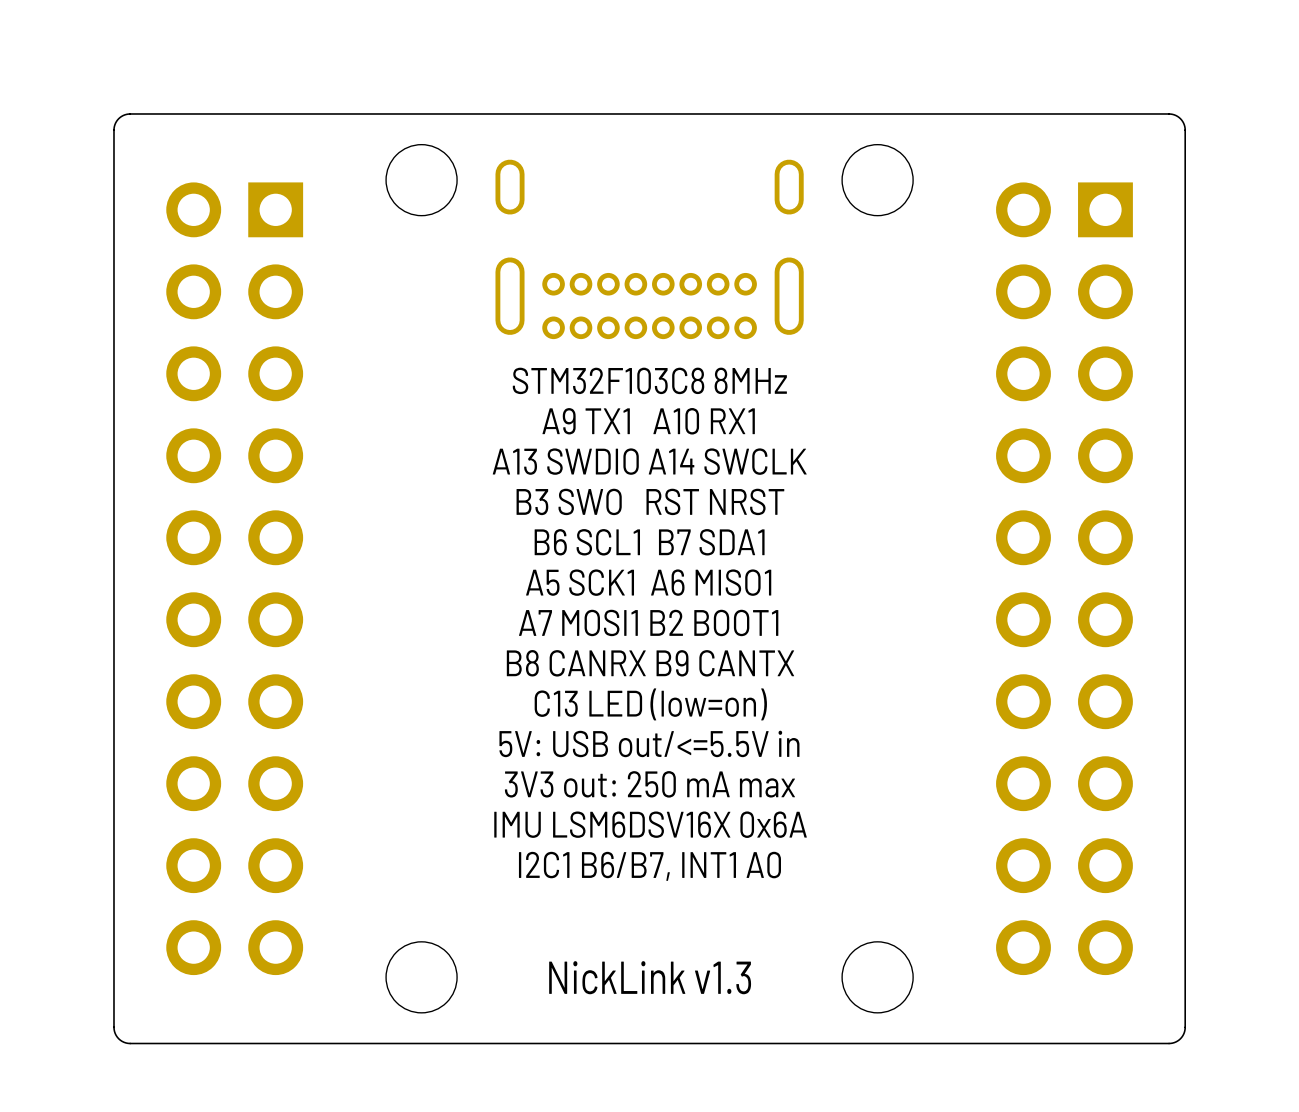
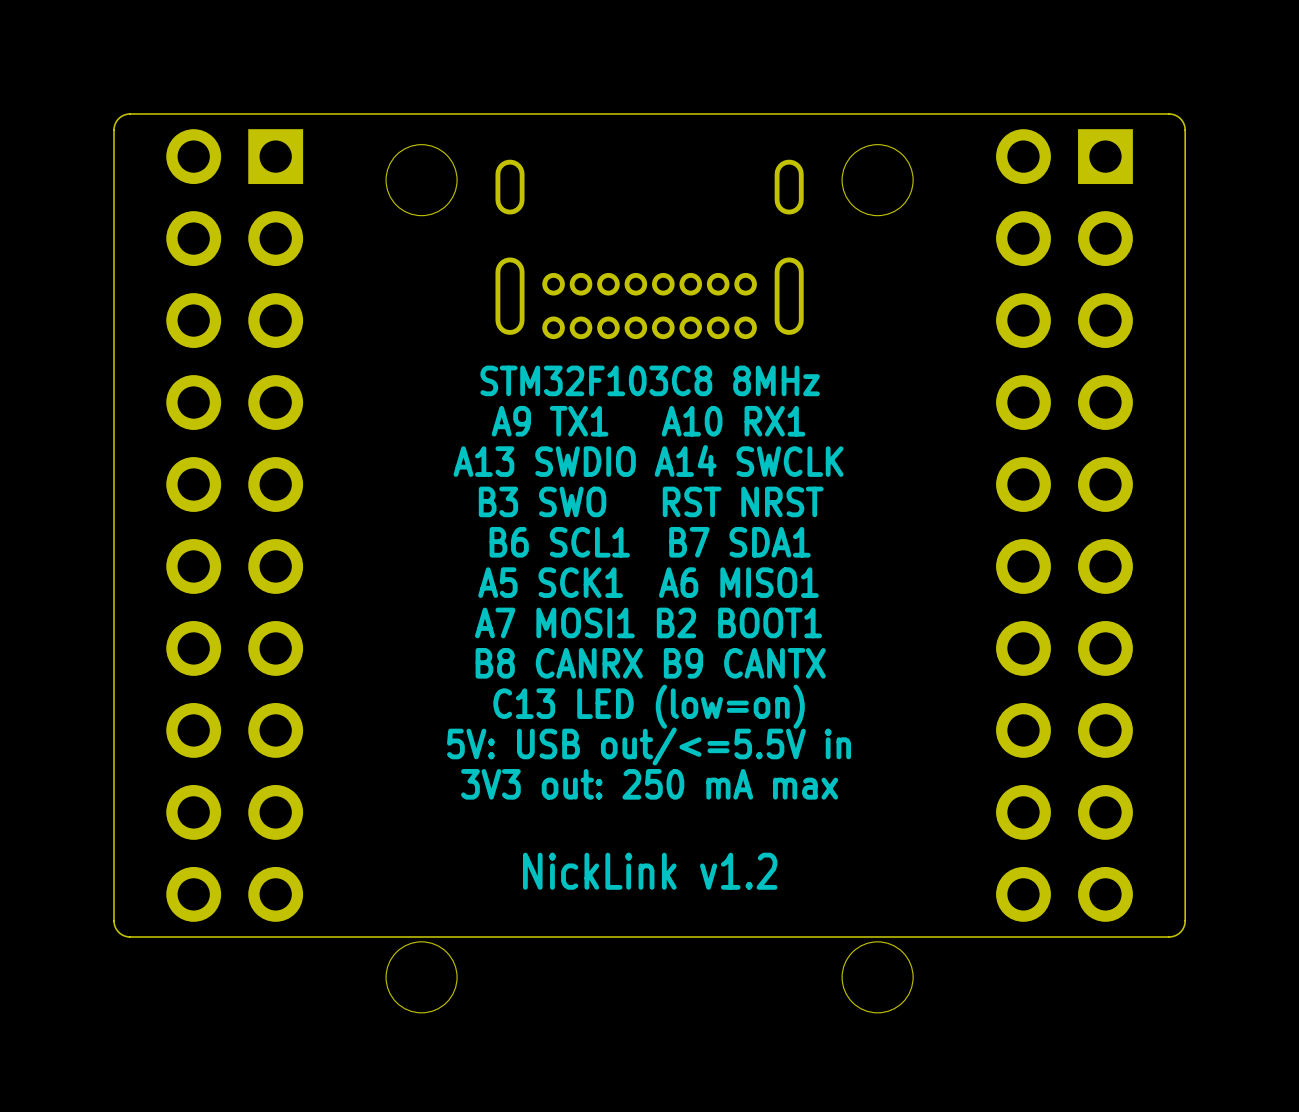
part position: (234, 578) -> (234, 525)
part position: (1064, 578) -> (1064, 525)
text: IMU LSM6DSV16X 0x6A (650, 824) -> none
text: I2C1 B6/B7, INT1 A0 (649, 866) -> NickLink v1.2 (650, 871)
board edge: (1185, 920) (1185, 1029) (1179, 1039) (1169, 1043) (128, 1043) (118, 1038) (114, 1029) (113, 920) -> (1185, 920) (1180, 932) (1169, 936) (130, 936) (118, 932) (113, 920)
text: NickLink v1.3 (650, 977) -> none

